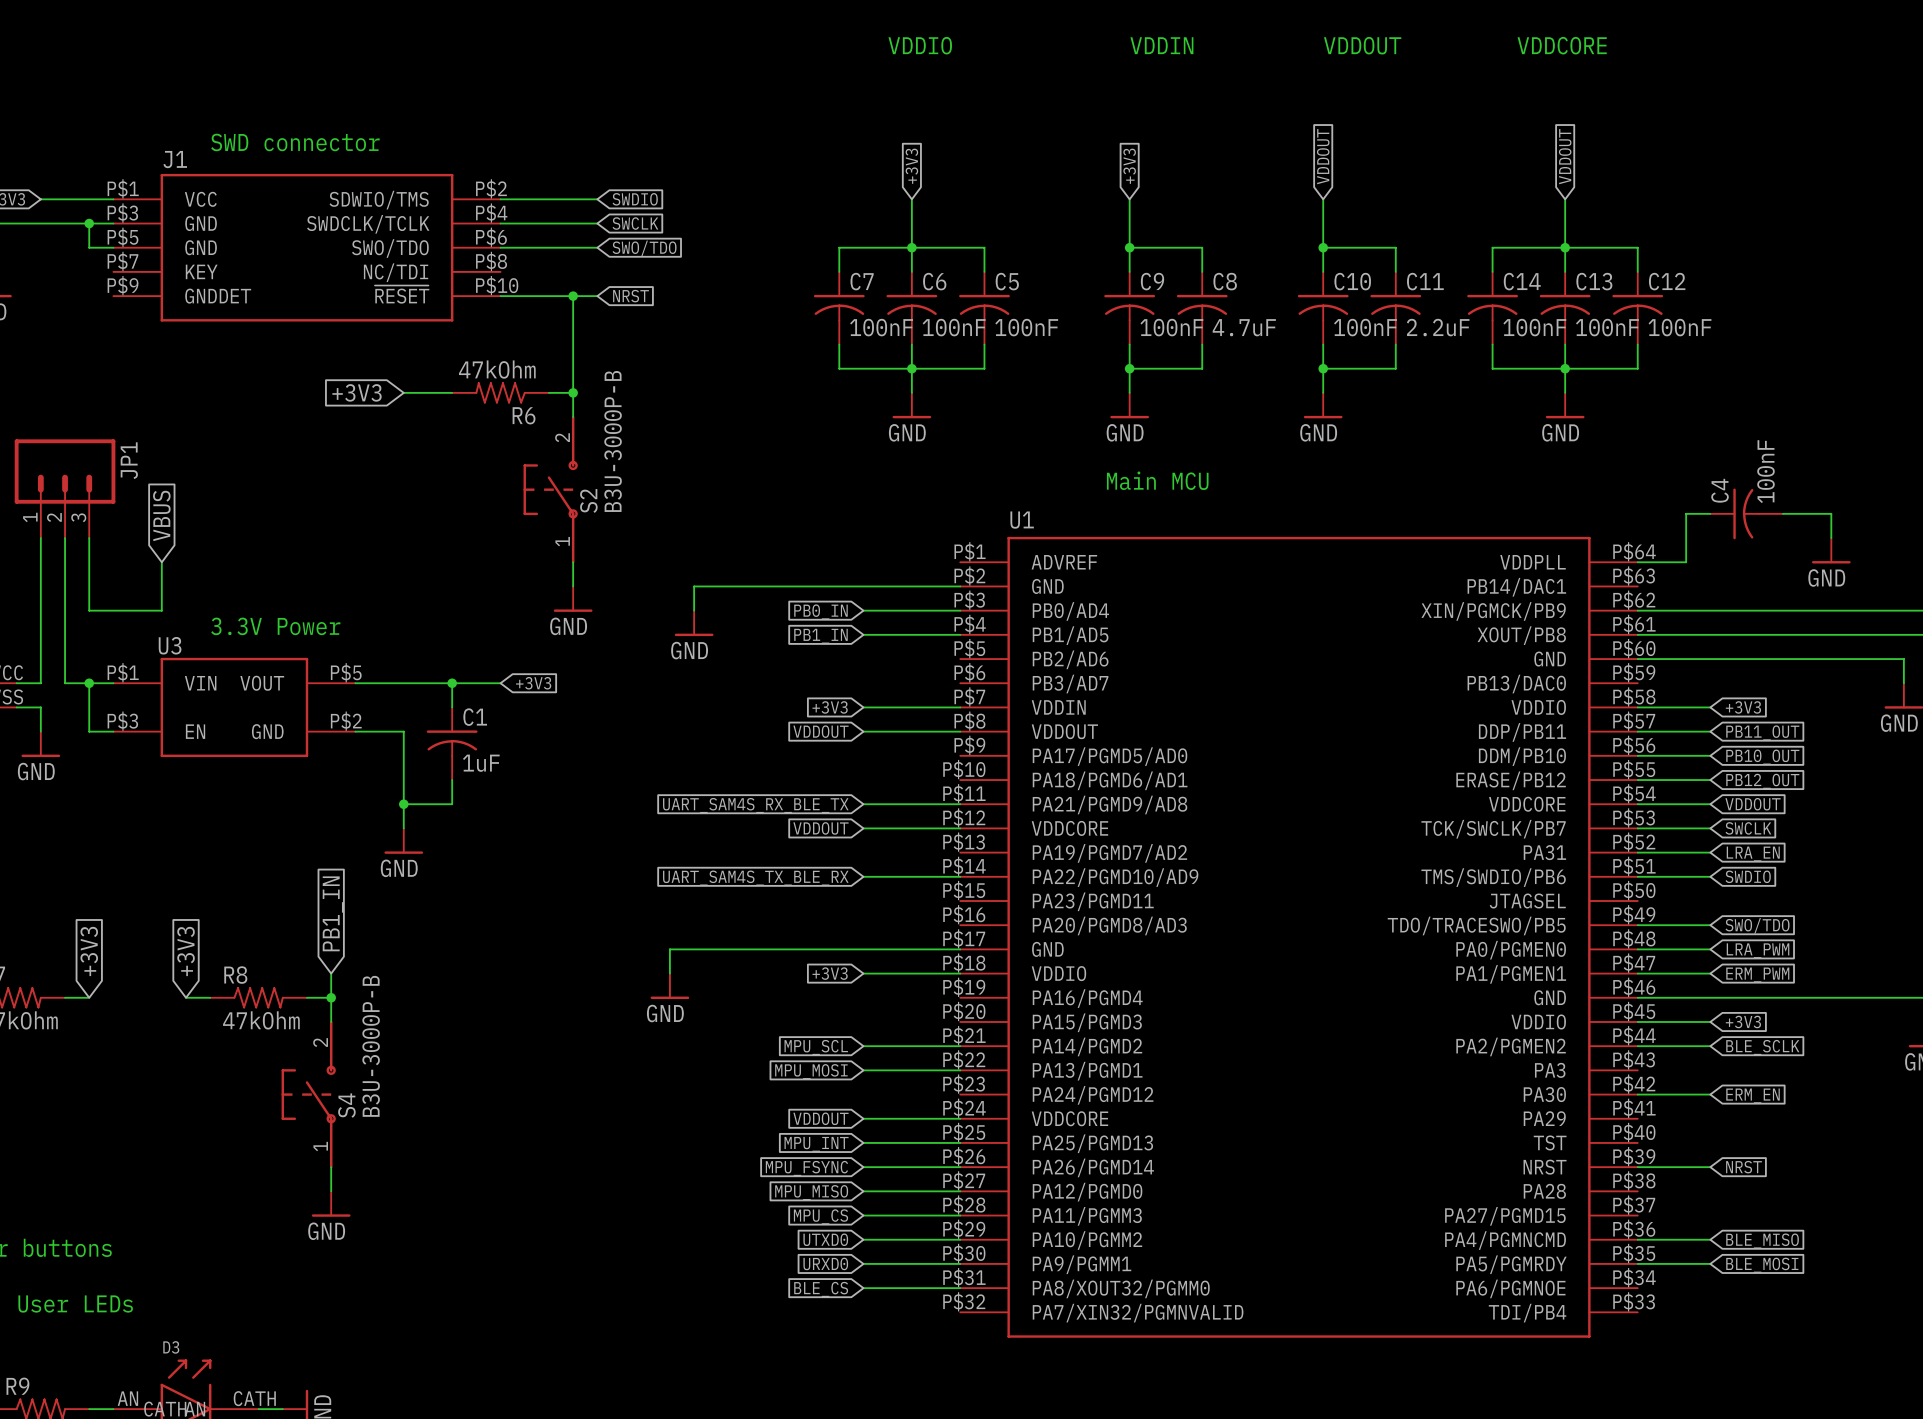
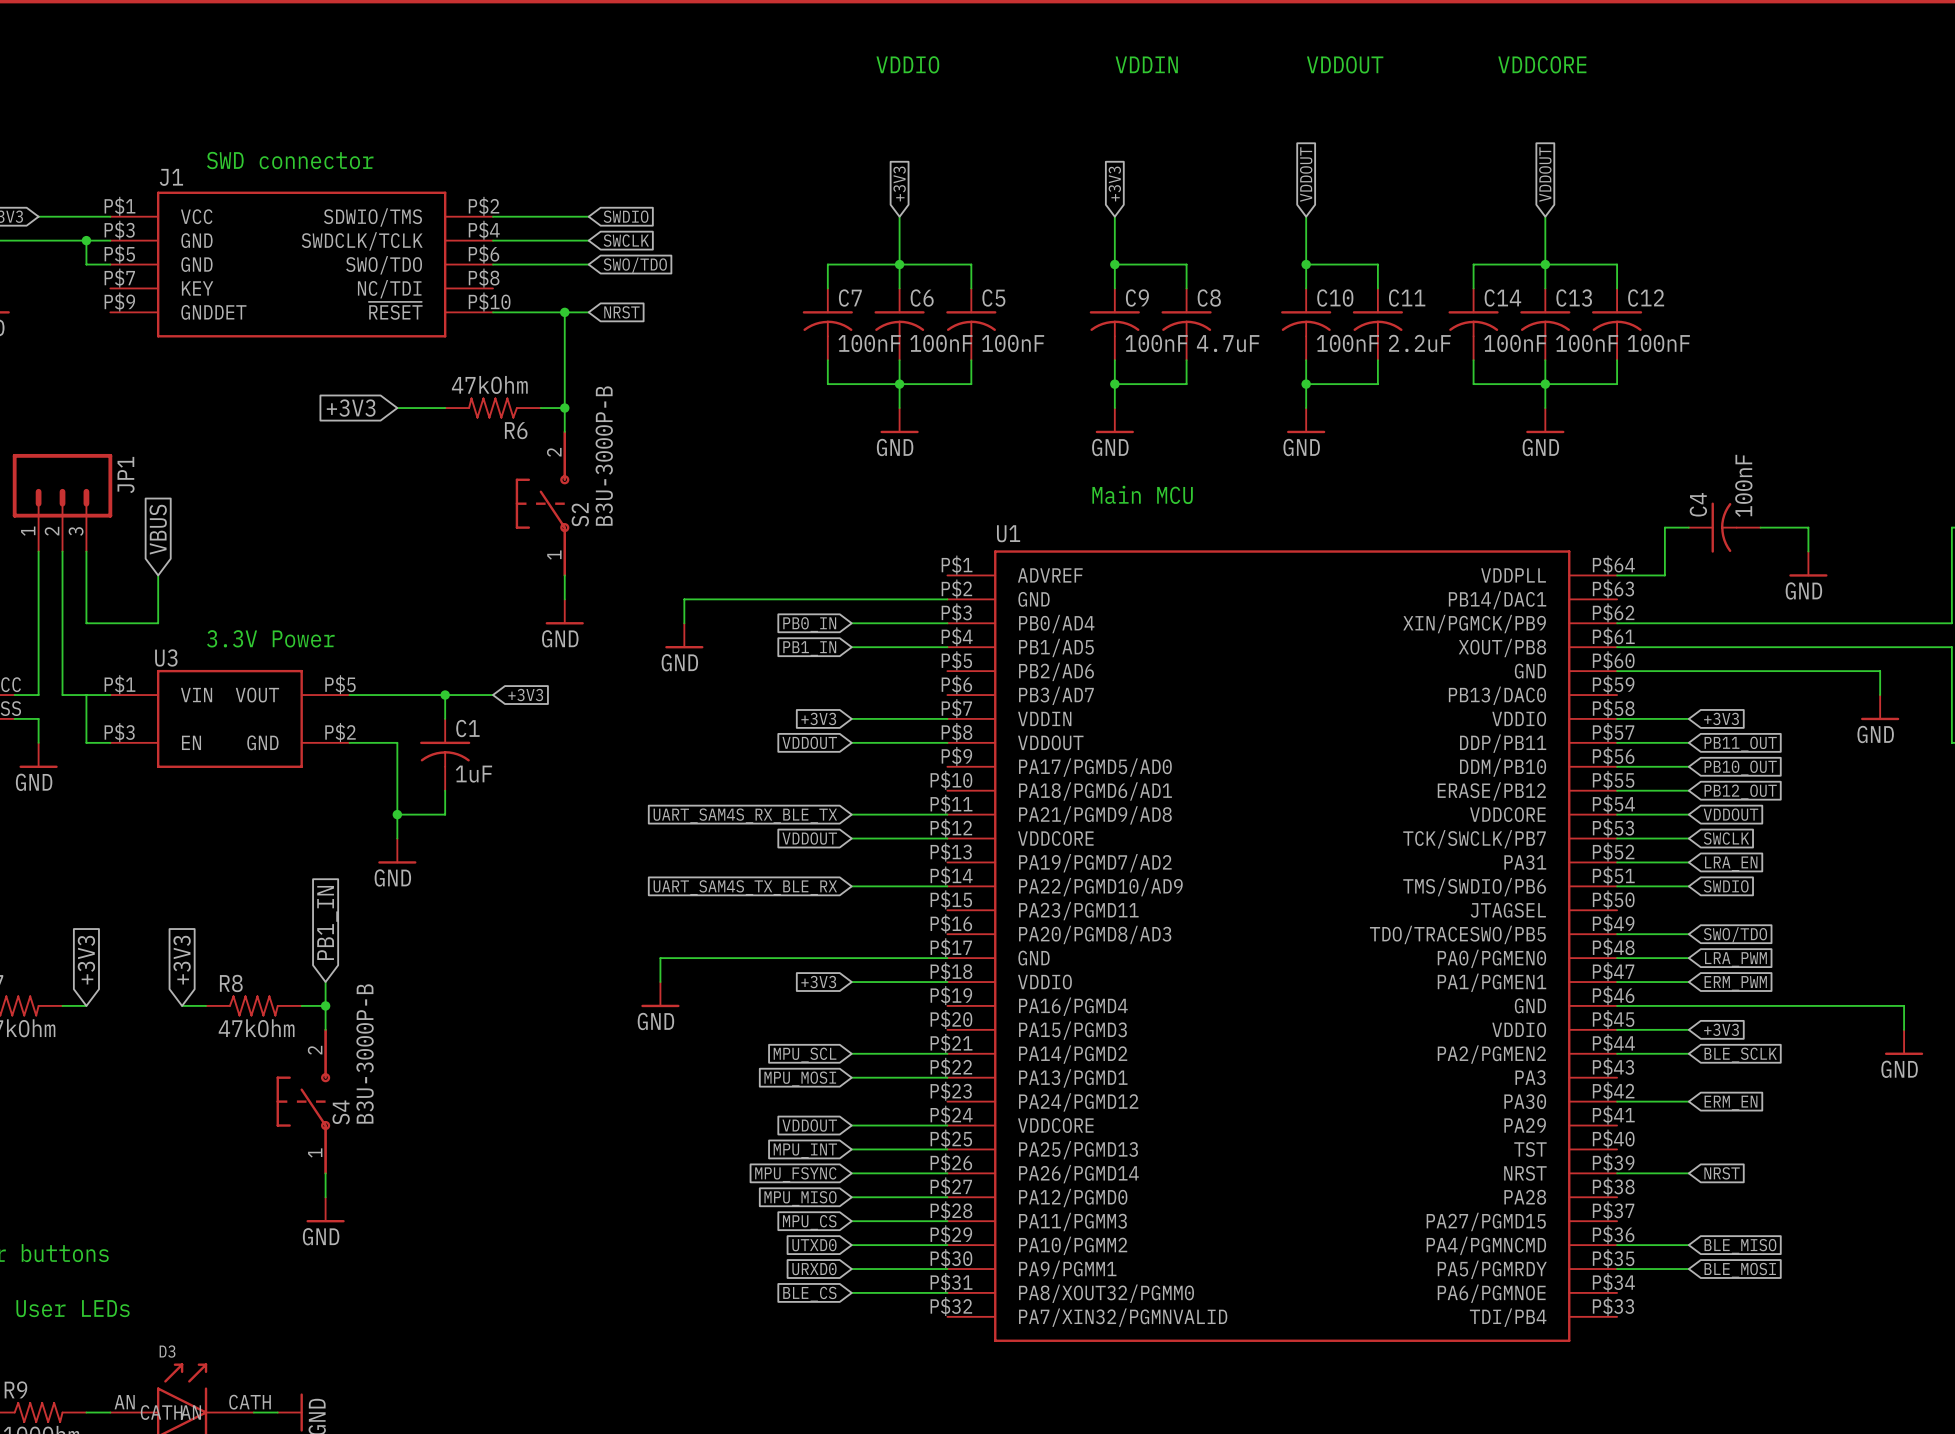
junction: (89, 683) -> none

